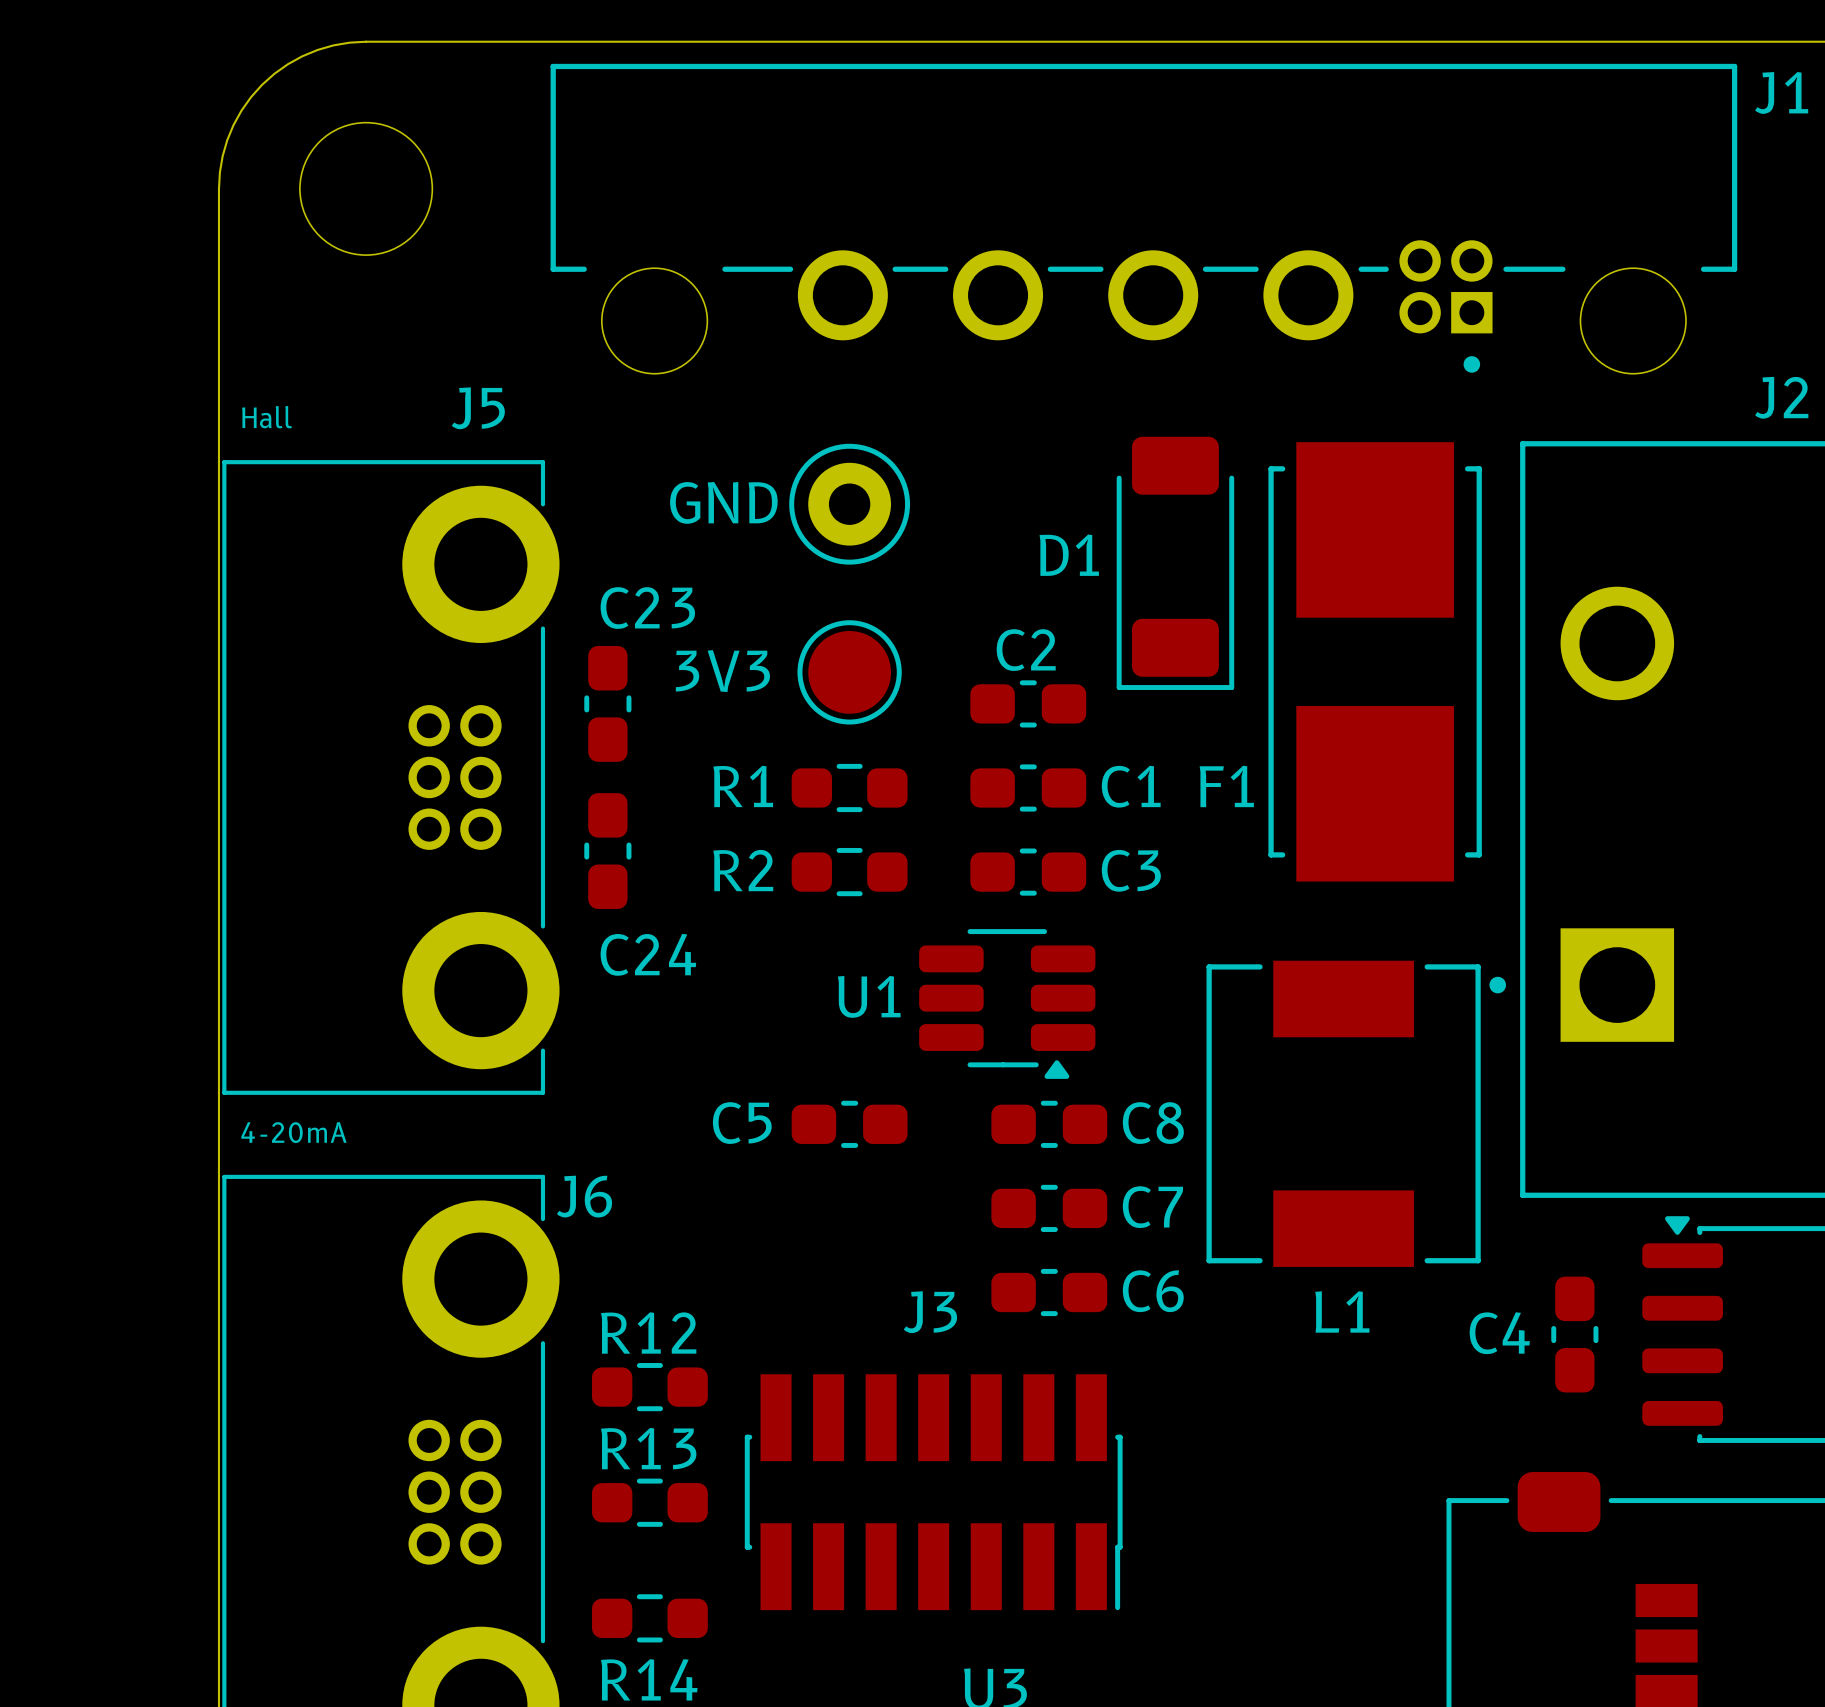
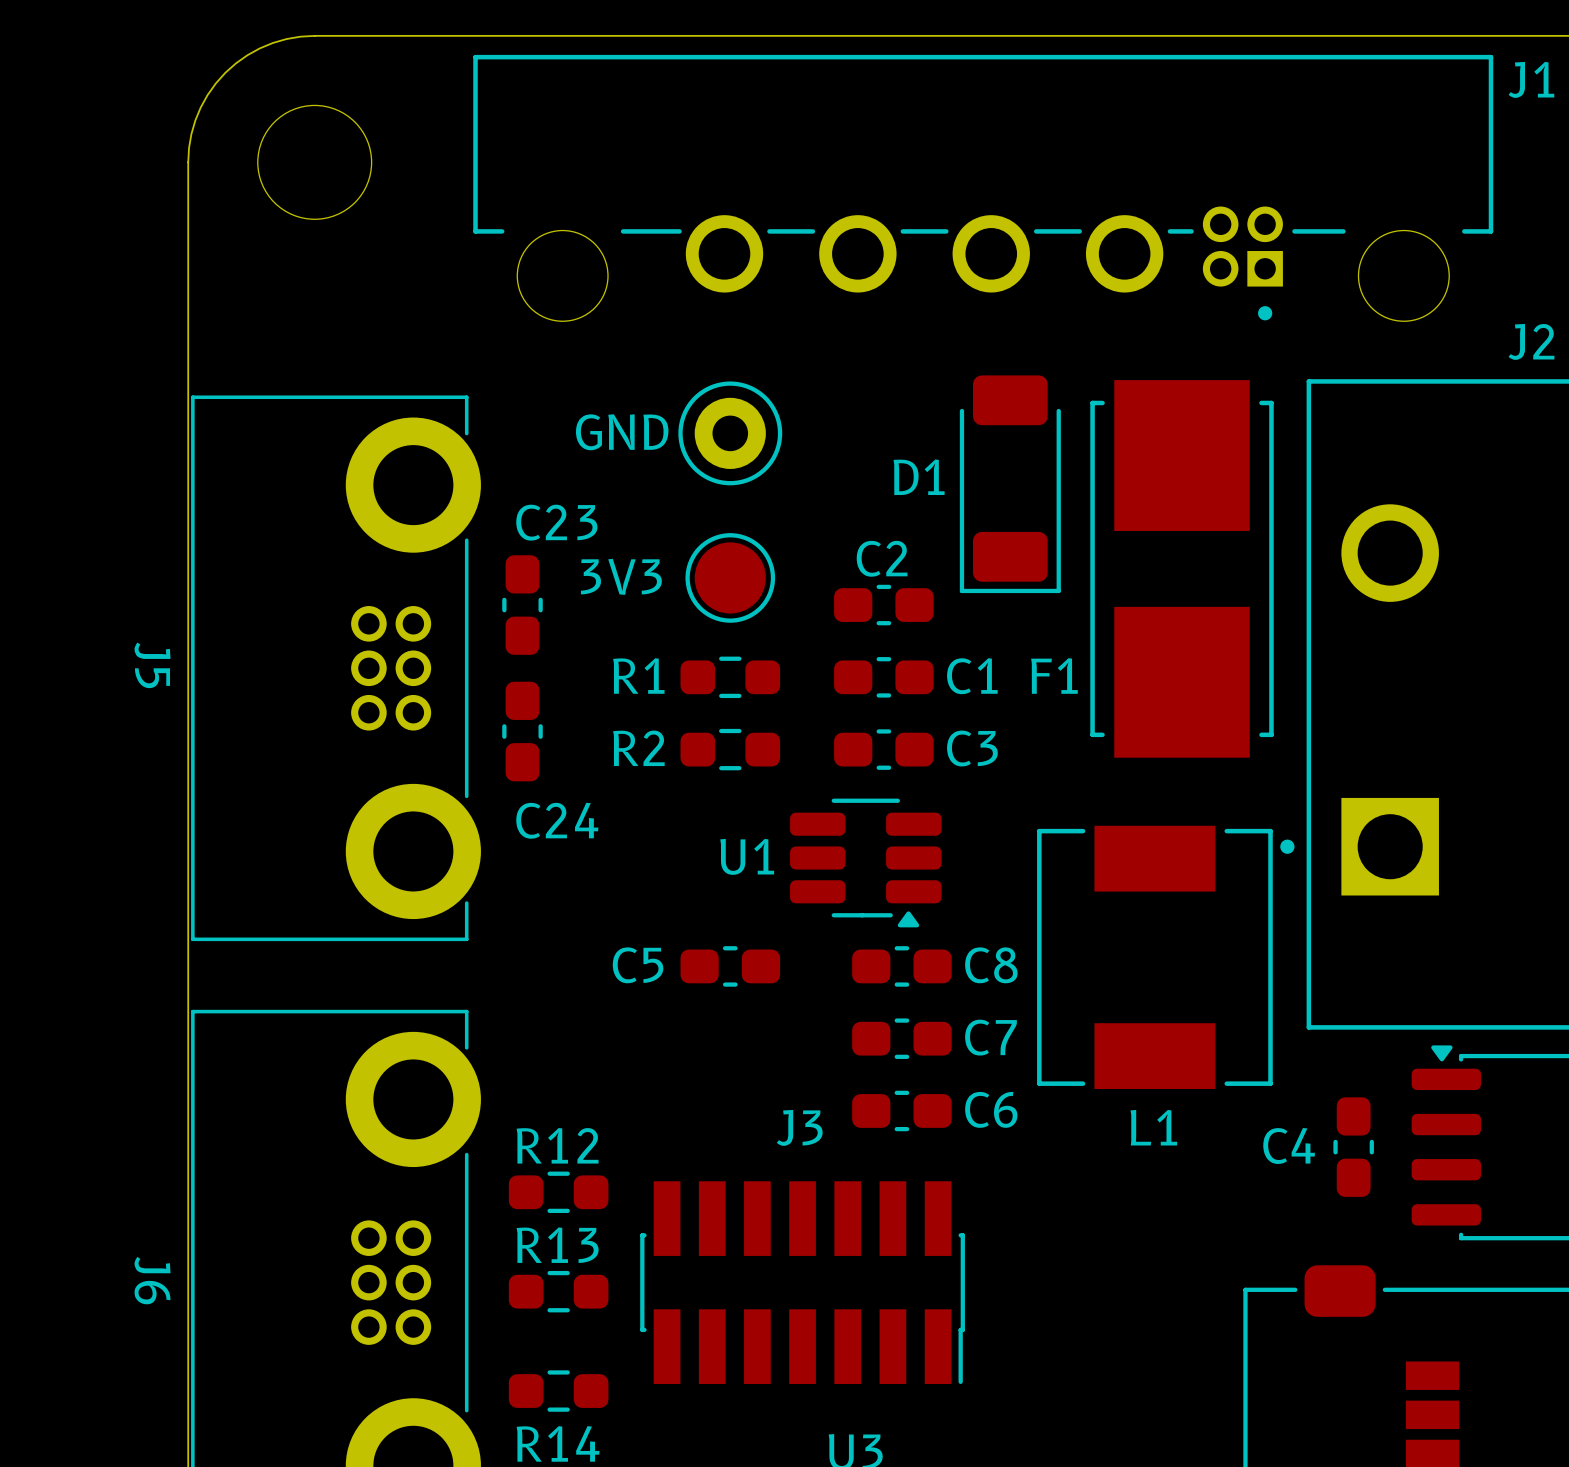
J5 name rotation: 0° (478, 408) -> 90° clockwise (152, 665)
J5 name position: J5 (478, 408) -> J5 (152, 665)
text: Hall (267, 417) -> none
text: 4-20mA (294, 1132) -> none
J6 name rotation: 0° (584, 1196) -> 90° clockwise (152, 1280)
J6 name position: J6 (584, 1196) -> J6 (152, 1280)

